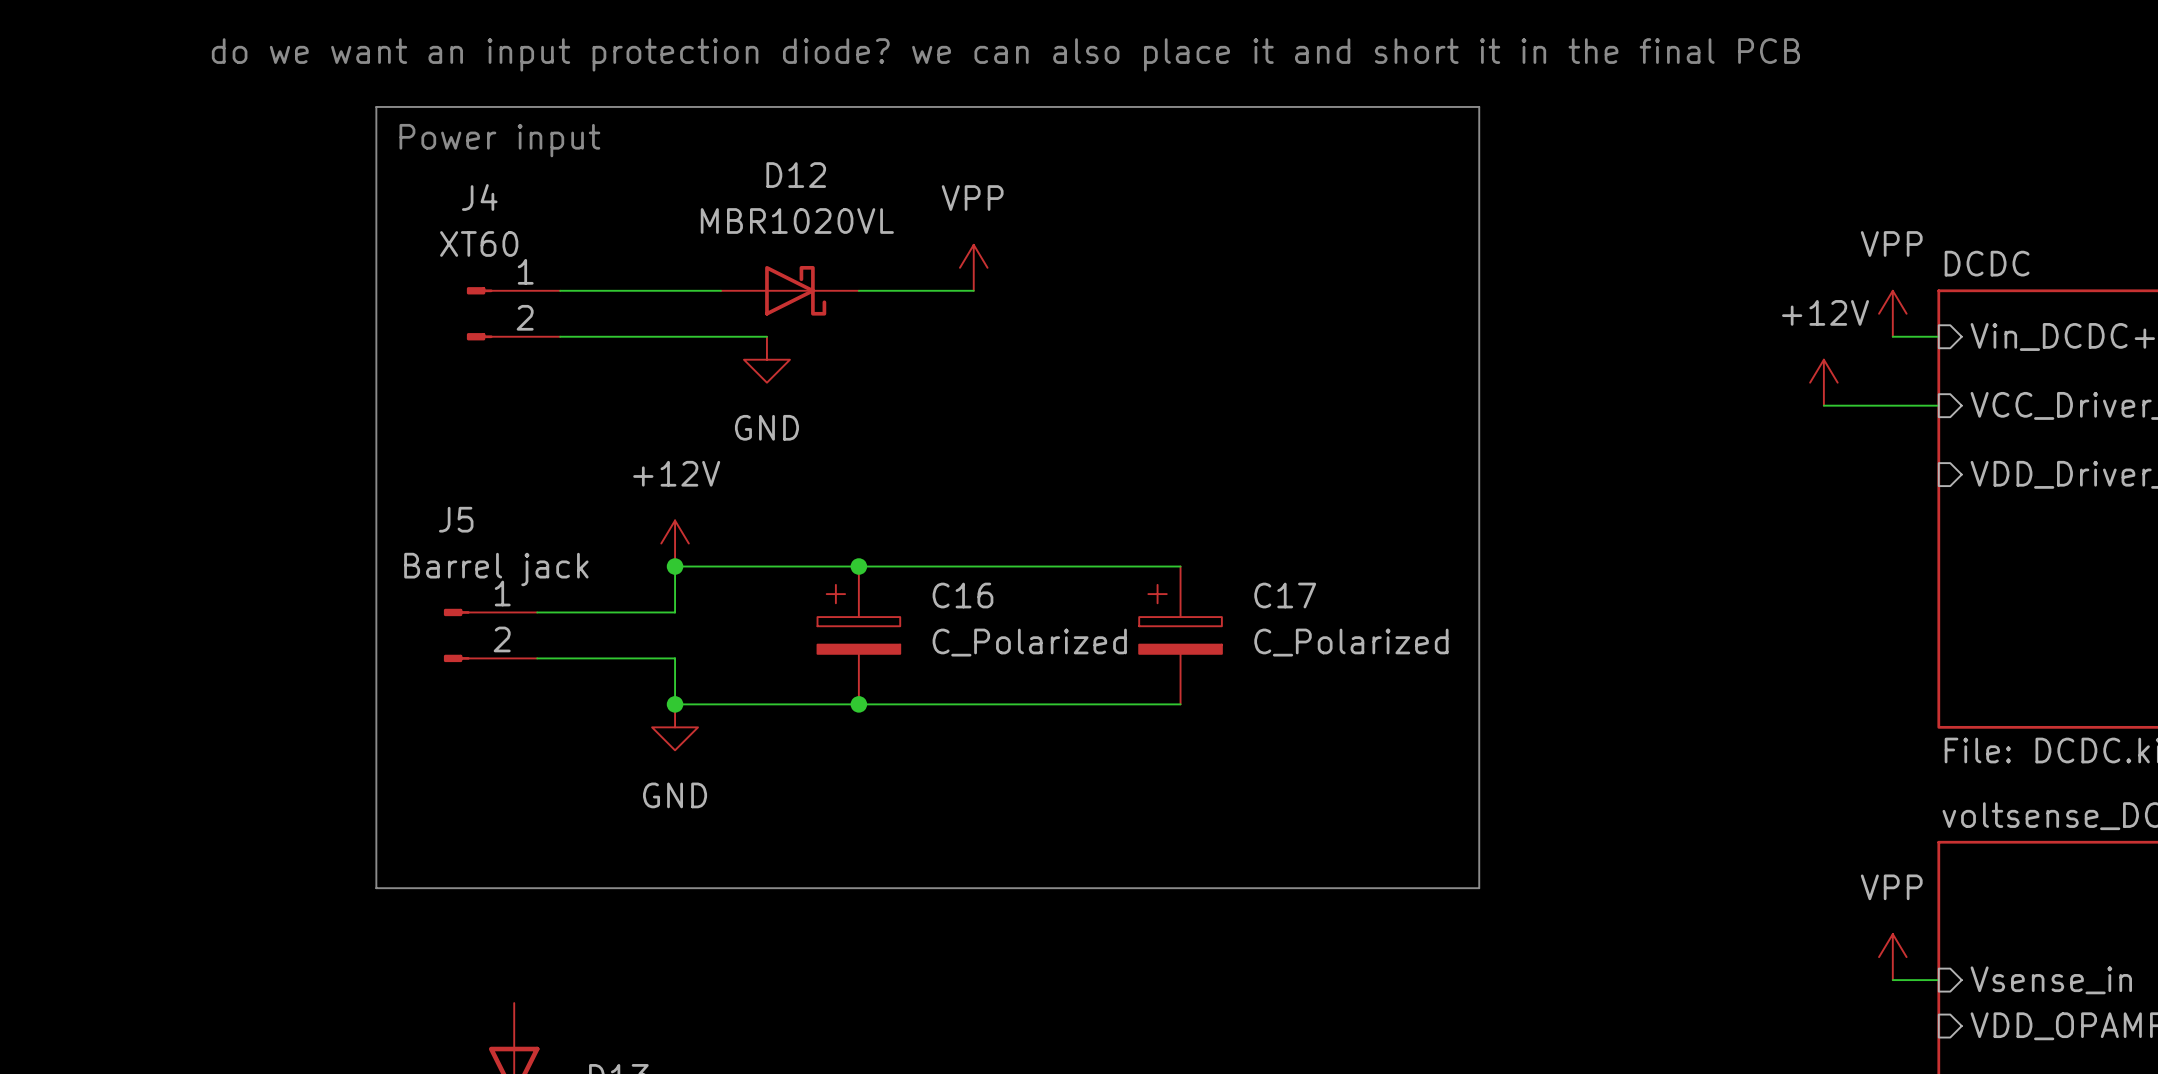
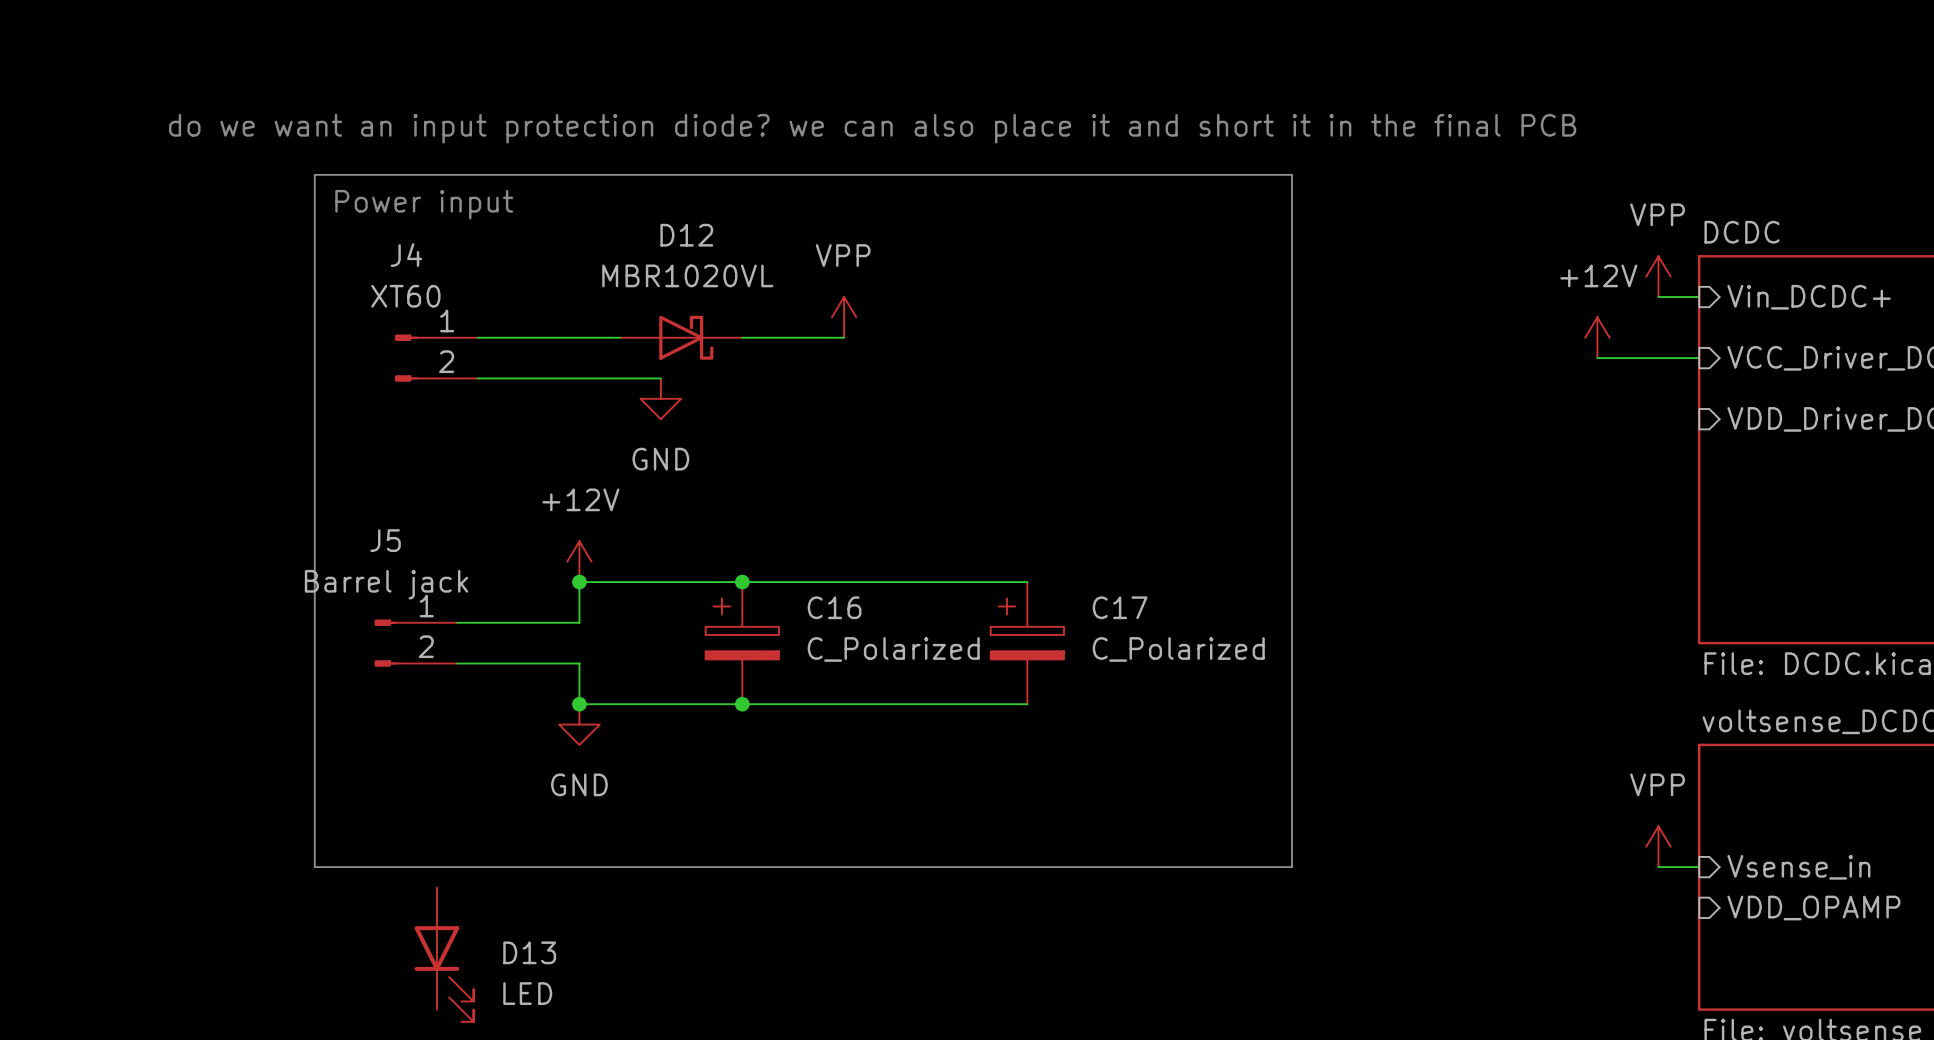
text position: do we want an input protection diode? we can also place it and short it in the final PCB (1005, 54) -> do we want an input protection diode? we can also place it and short it in the final PCB (872, 128)
text position: Power input (499, 140) -> Power input (424, 204)
line: (376, 198) (376, 106) (1479, 106) (1479, 198) -> (314, 174) (1292, 174)
power symbol position: VPP (973, 267) -> VPP (844, 317)
wire: (560, 290) (721, 290) -> (477, 337) (620, 337)
D12 position: (789, 290) -> (681, 337)
wire: (858, 290) (973, 290) -> (742, 337) (844, 337)
J4 position: (513, 313) -> (436, 358)
wire: (560, 336) (766, 336) -> (477, 378) (660, 378)
power symbol position: GND (766, 359) -> GND (660, 398)
power symbol position: +12V (675, 543) -> +12V (579, 561)
junction: (675, 566) -> none
junction: (858, 566) -> none
wire: (1180, 566) (675, 566) (675, 612) (537, 612) -> none
J5 value position: Barrel jack (496, 569) -> Barrel jack (386, 584)
J5 position: (490, 635) -> (415, 643)
C16 position: (858, 635) -> (742, 643)
C17 position: (1180, 635) -> (1027, 643)
wire: (537, 658) (675, 658) -> (1027, 582) (579, 582)
junction: none -> (579, 582)
junction: none -> (742, 582)
wire: (675, 704) (1180, 704) -> (579, 622) (457, 622)
junction: (675, 704) -> none
junction: (858, 704) -> none
power symbol position: GND (675, 727) -> GND (579, 724)
wire: none -> (457, 663) (579, 663) (579, 704) (1027, 704)
junction: none -> (579, 704)
junction: none -> (742, 704)
line: (376, 888) (1479, 888) -> (314, 785) (314, 867) (1292, 867) (1292, 785)

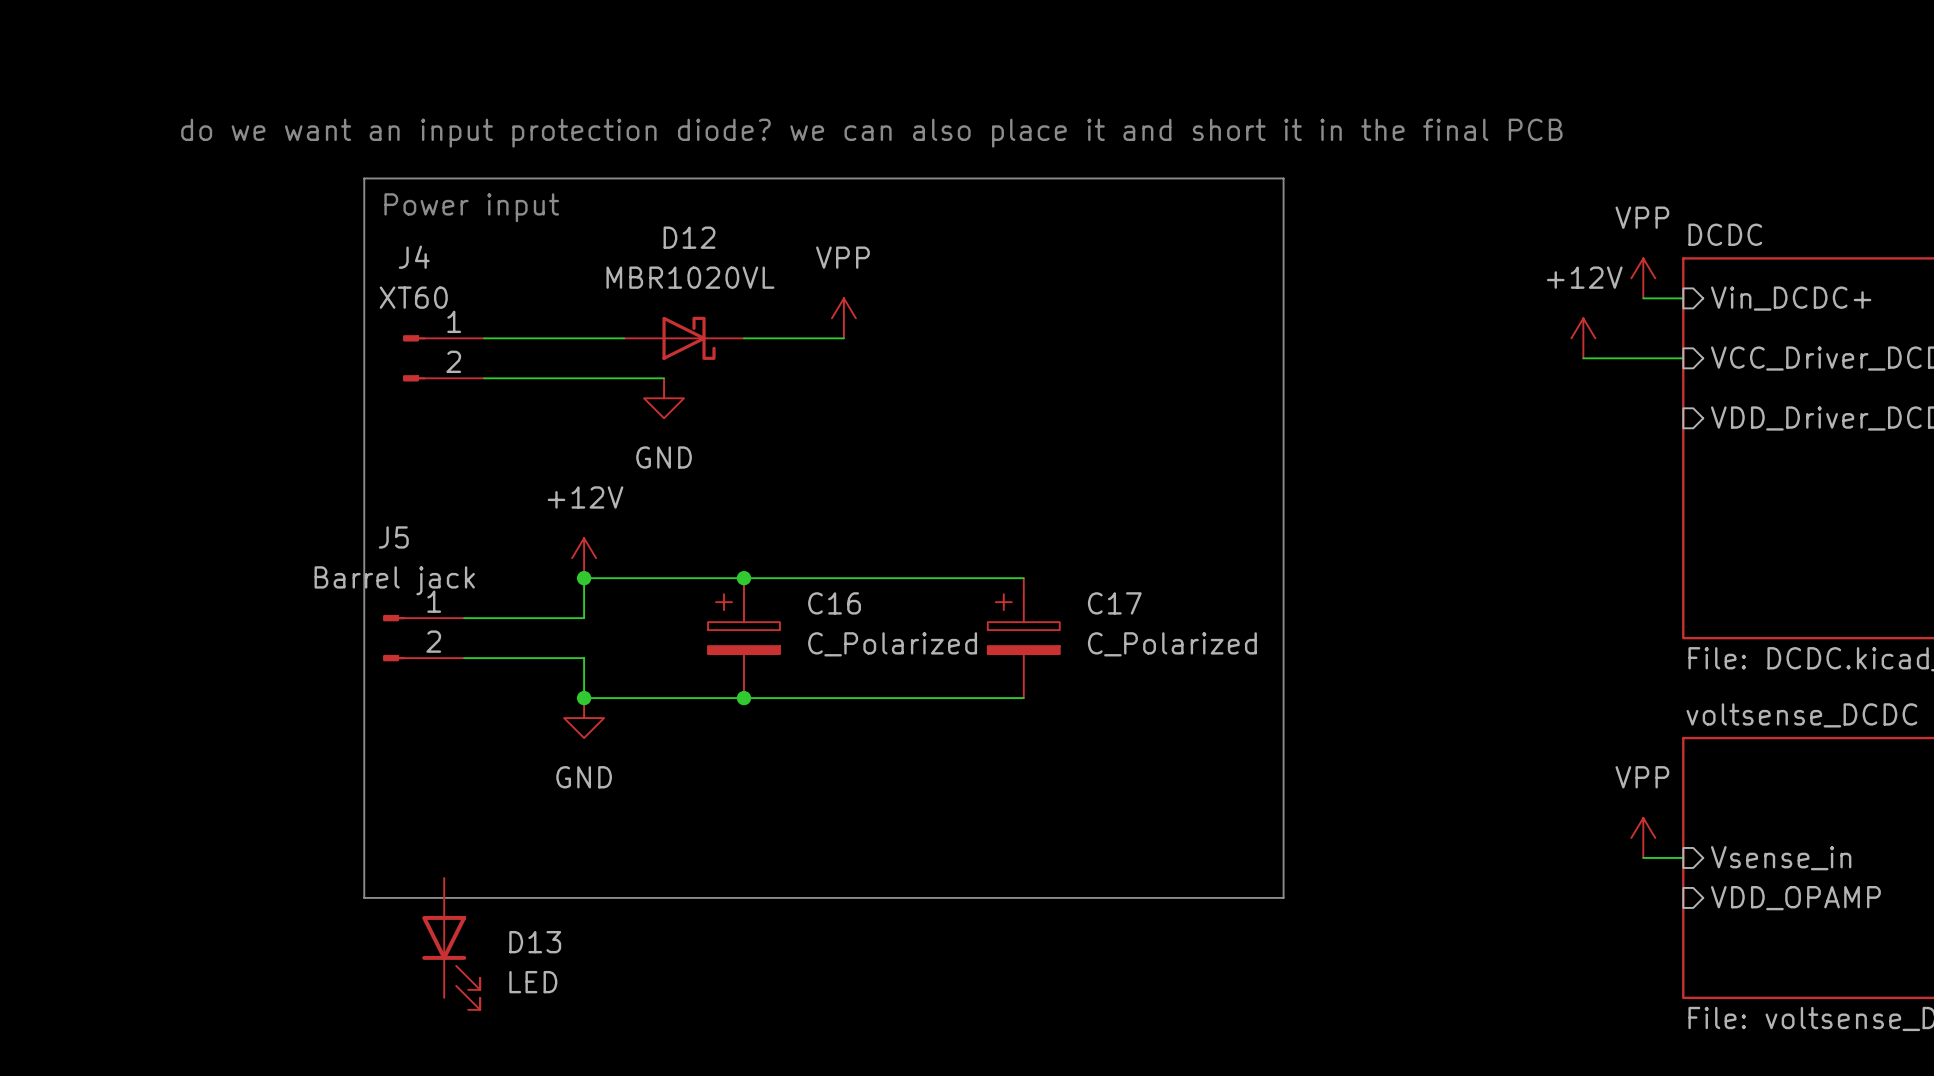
line: (355, 174) (314, 174) (314, 867) (1292, 867) -> (364, 178) (364, 897) (1283, 897) (1283, 857)
text position: Power input (424, 204) -> Power input (471, 207)

